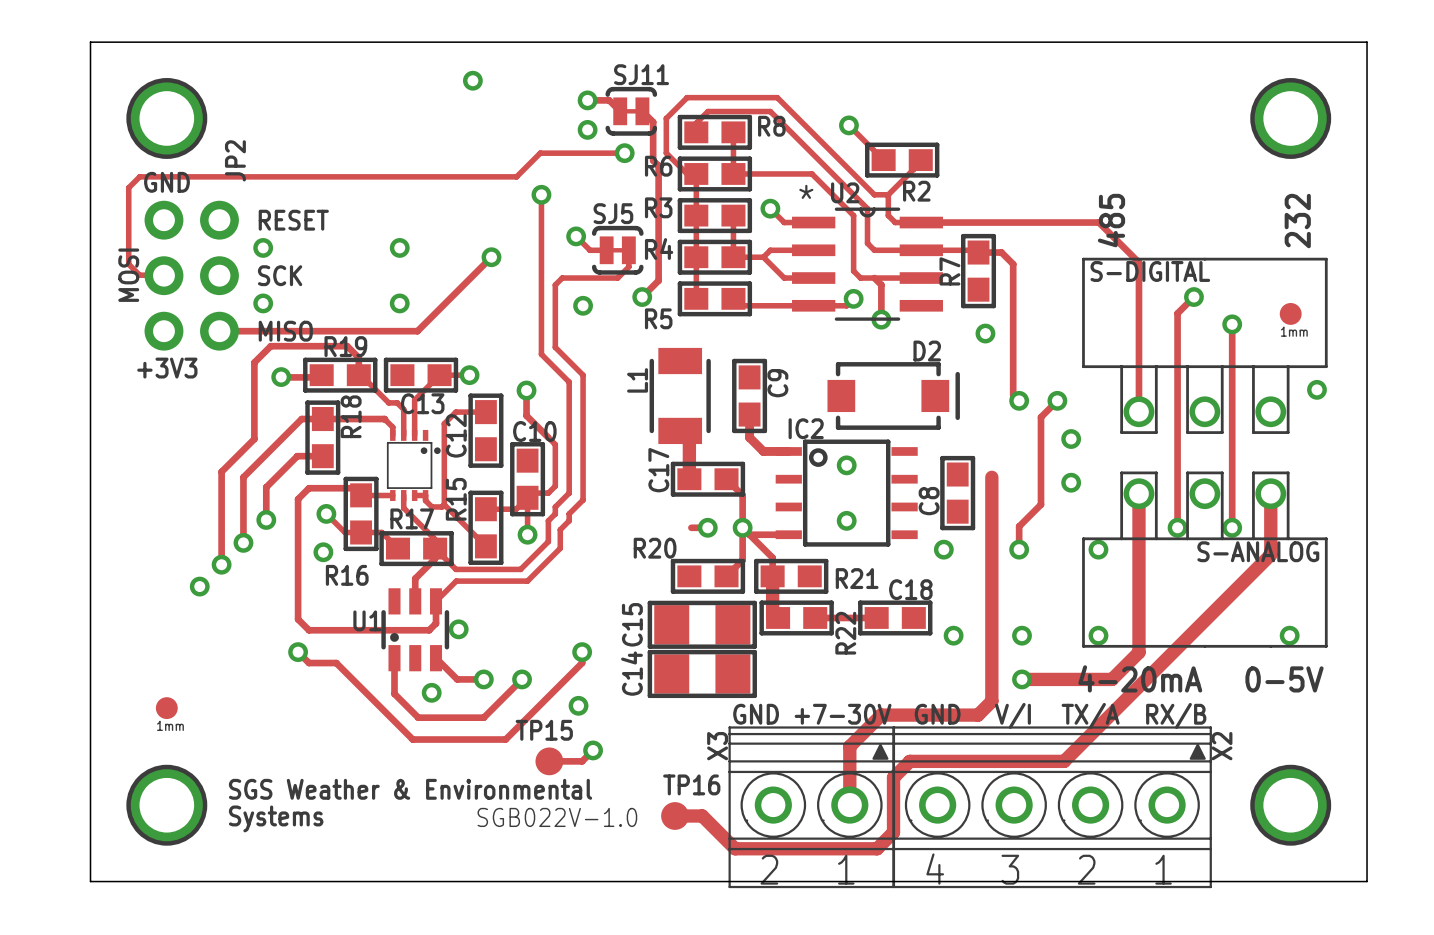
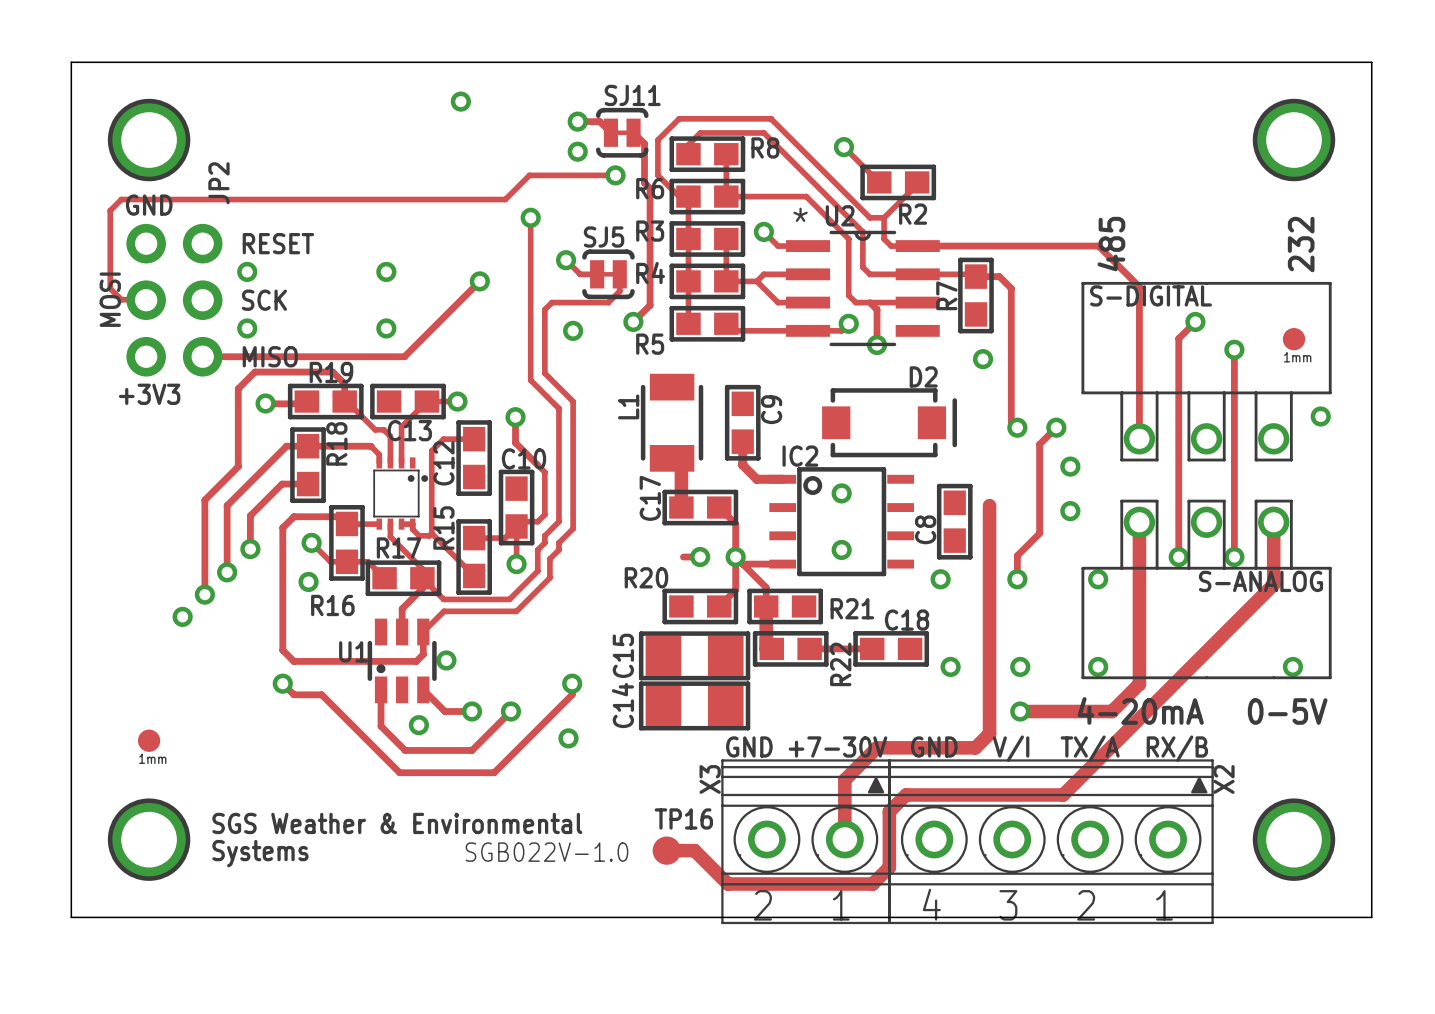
track: (593, 750) (582, 761) (549, 761) -> none
via: (593, 750) -> none
TP15: (549, 761) -> none

